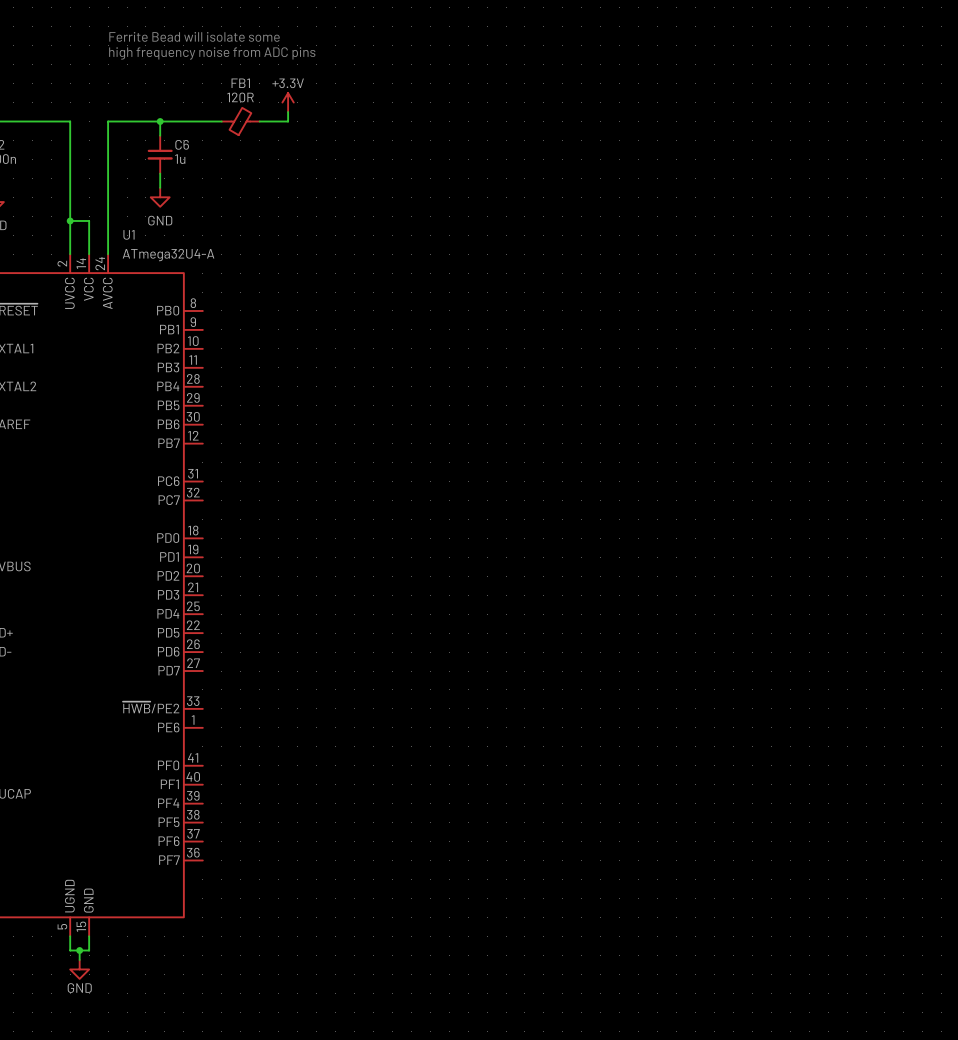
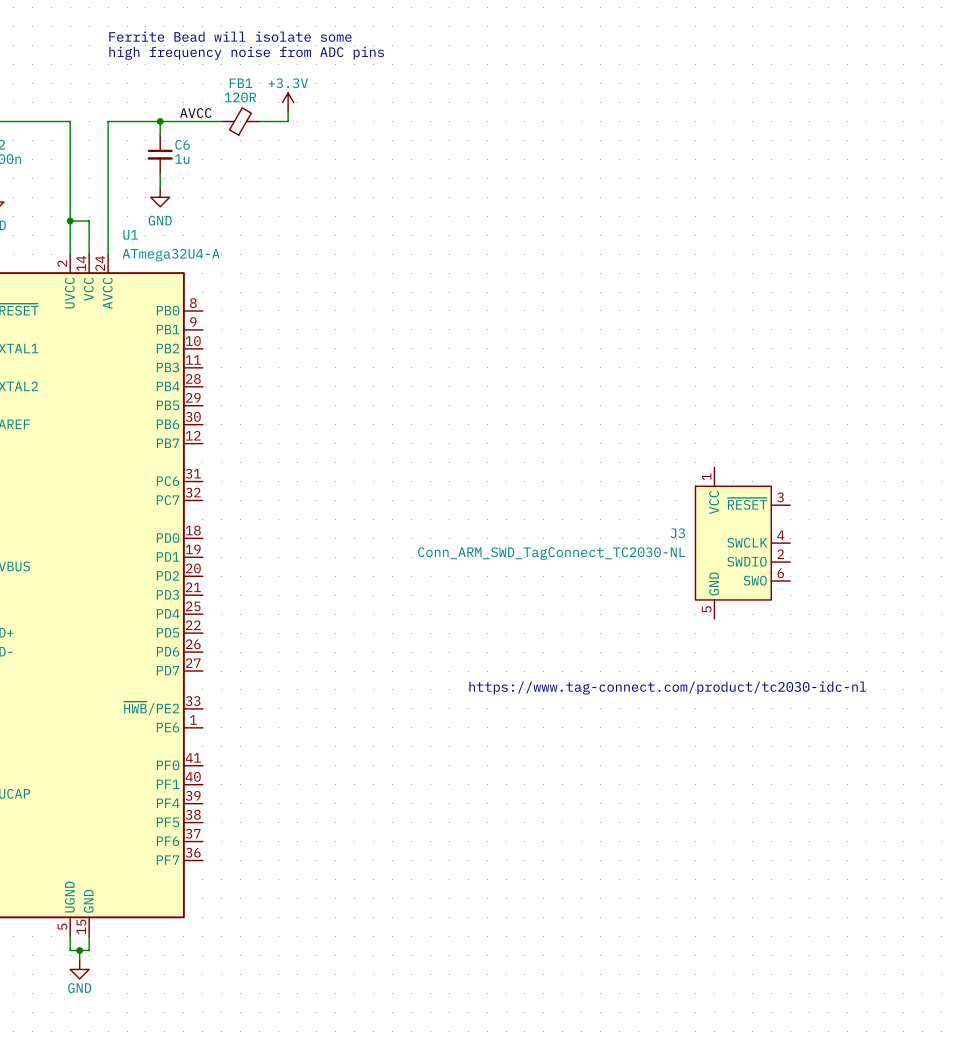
label: none -> AVCC (195, 113)
J3: none -> Conn_ARM_SWD_TagConnect_TC2030-NL (742, 543)
text: none -> https://www.tag-connect.com/product/tc2030-idc-nl (667, 687)

